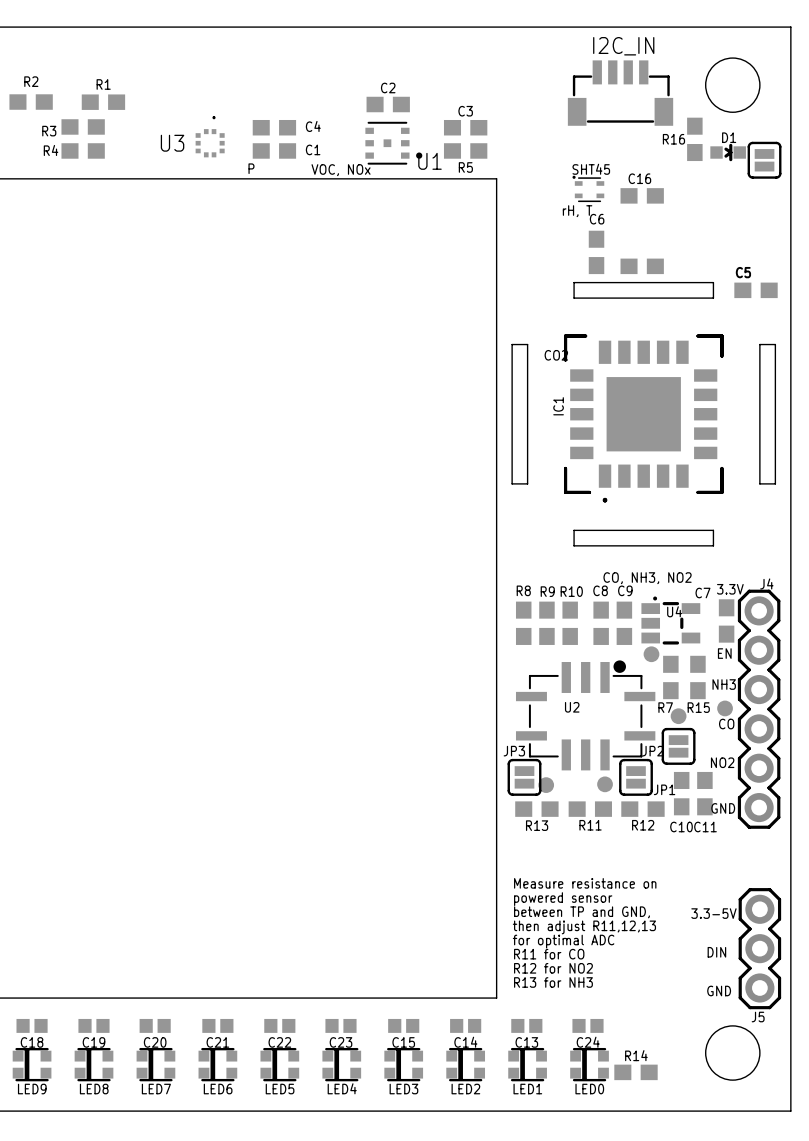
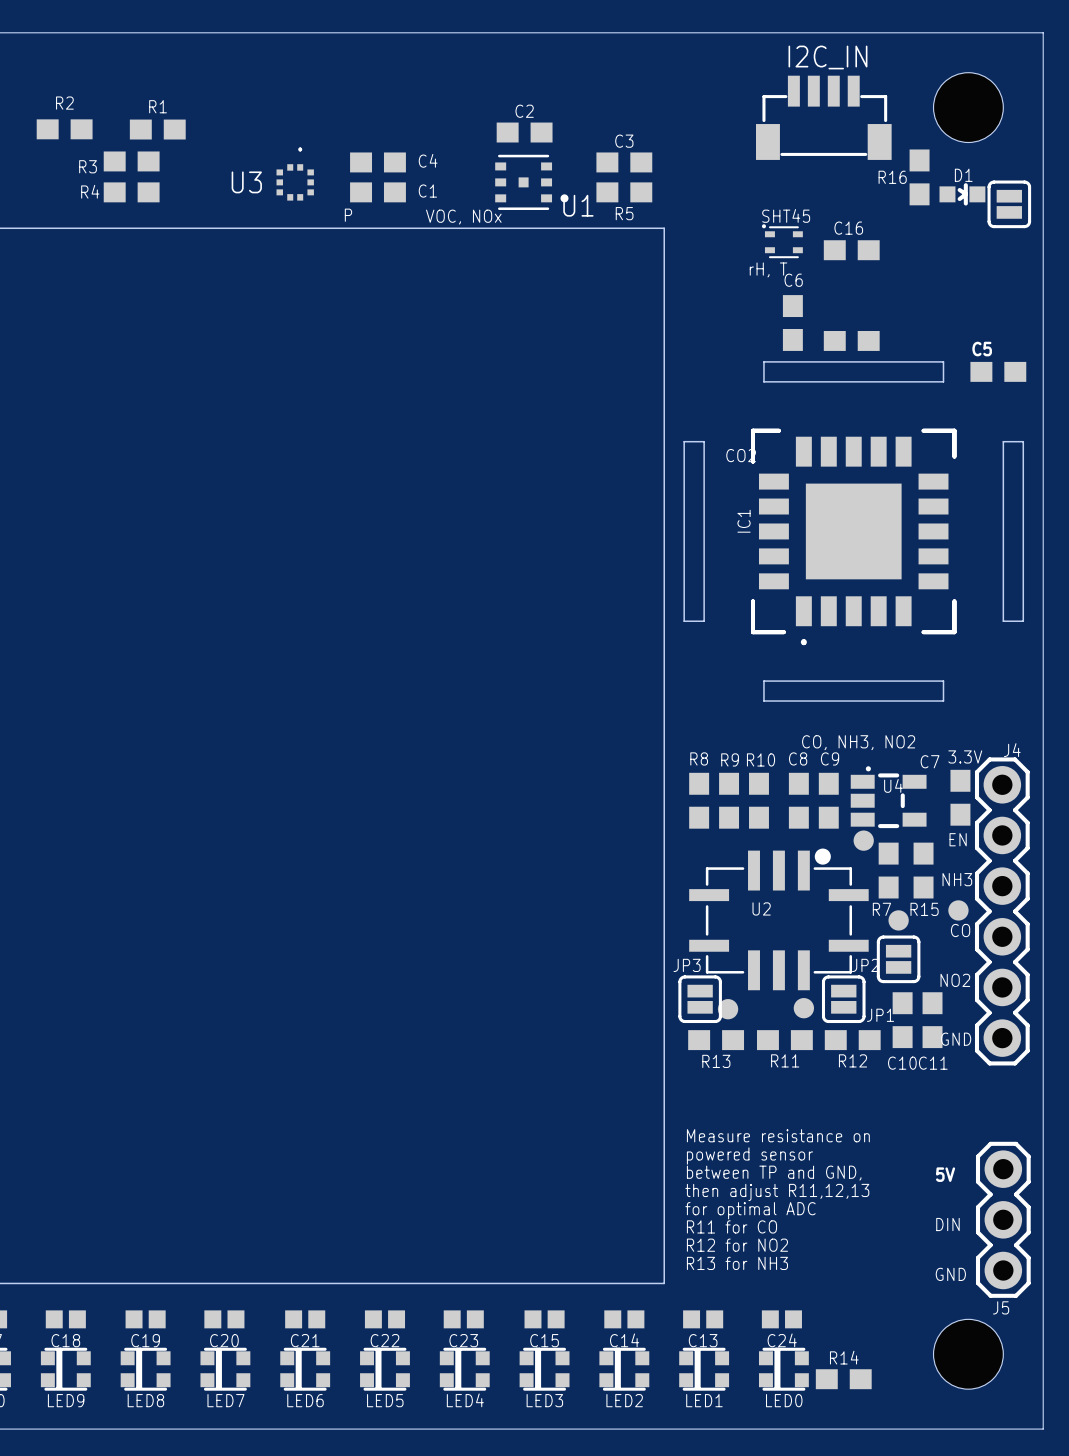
text: 3.3-5V (713, 913) -> 5V (945, 1174)

